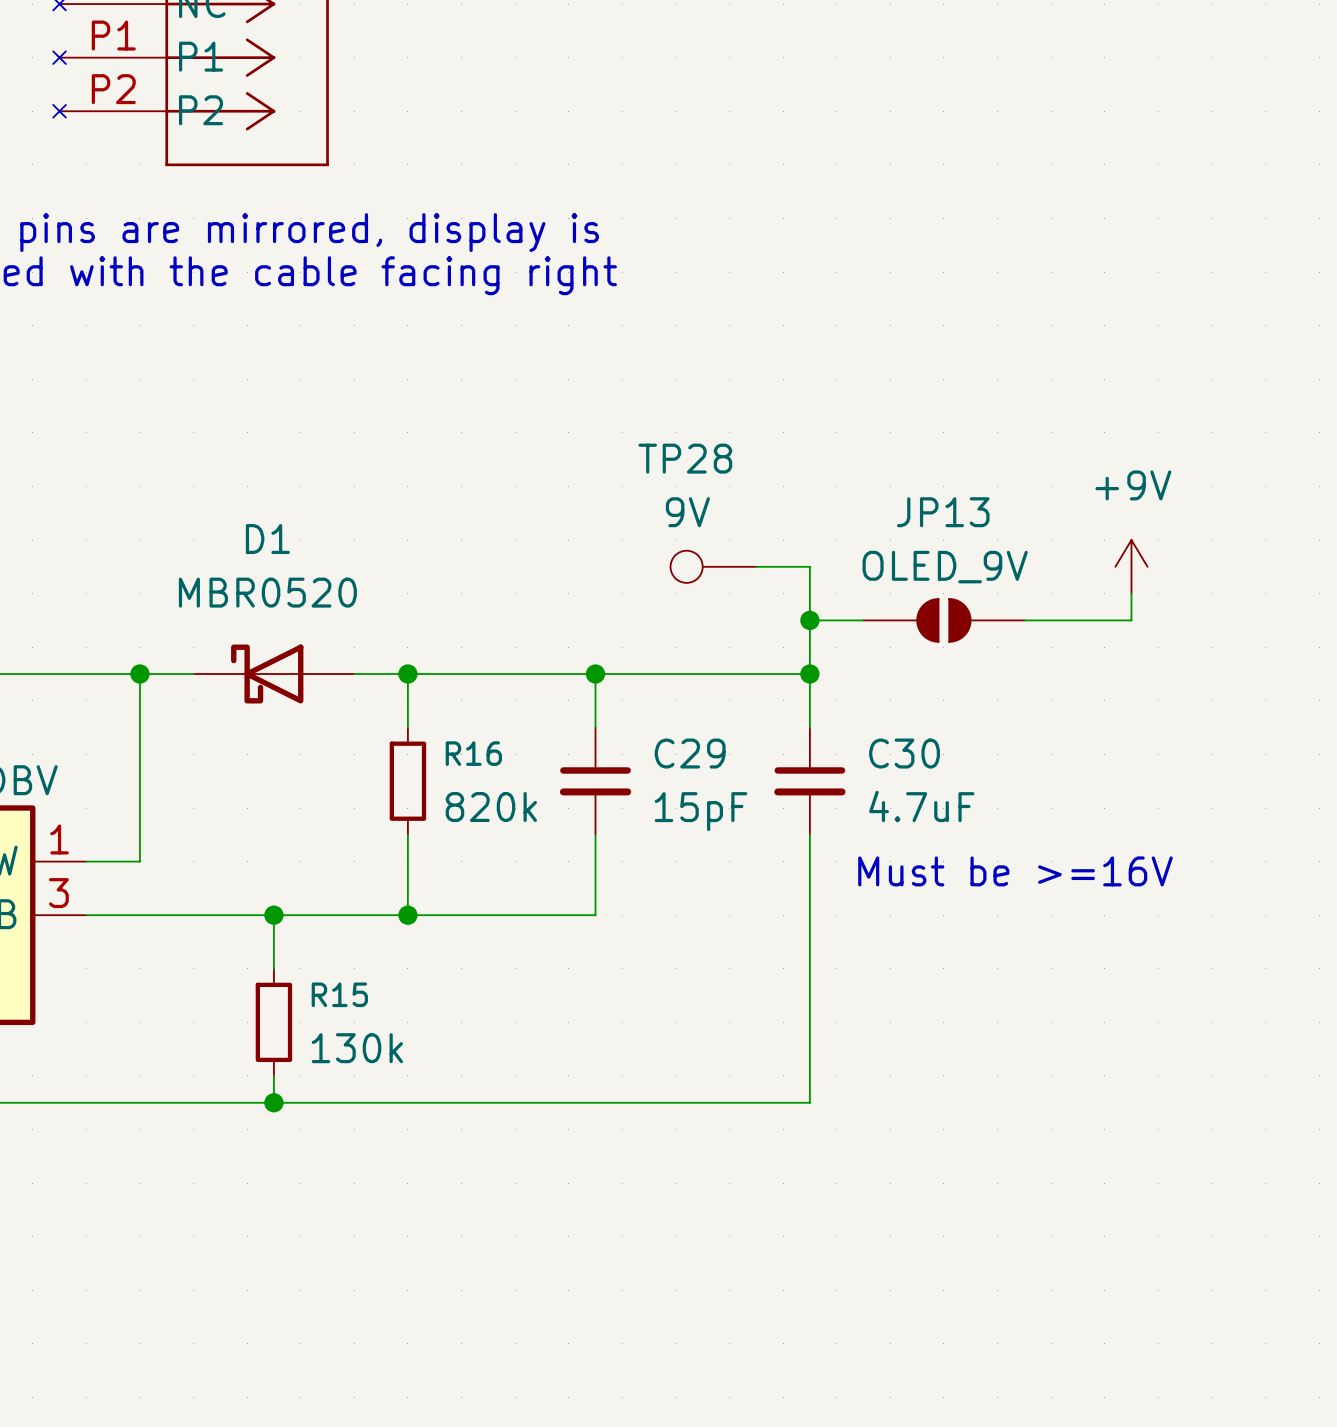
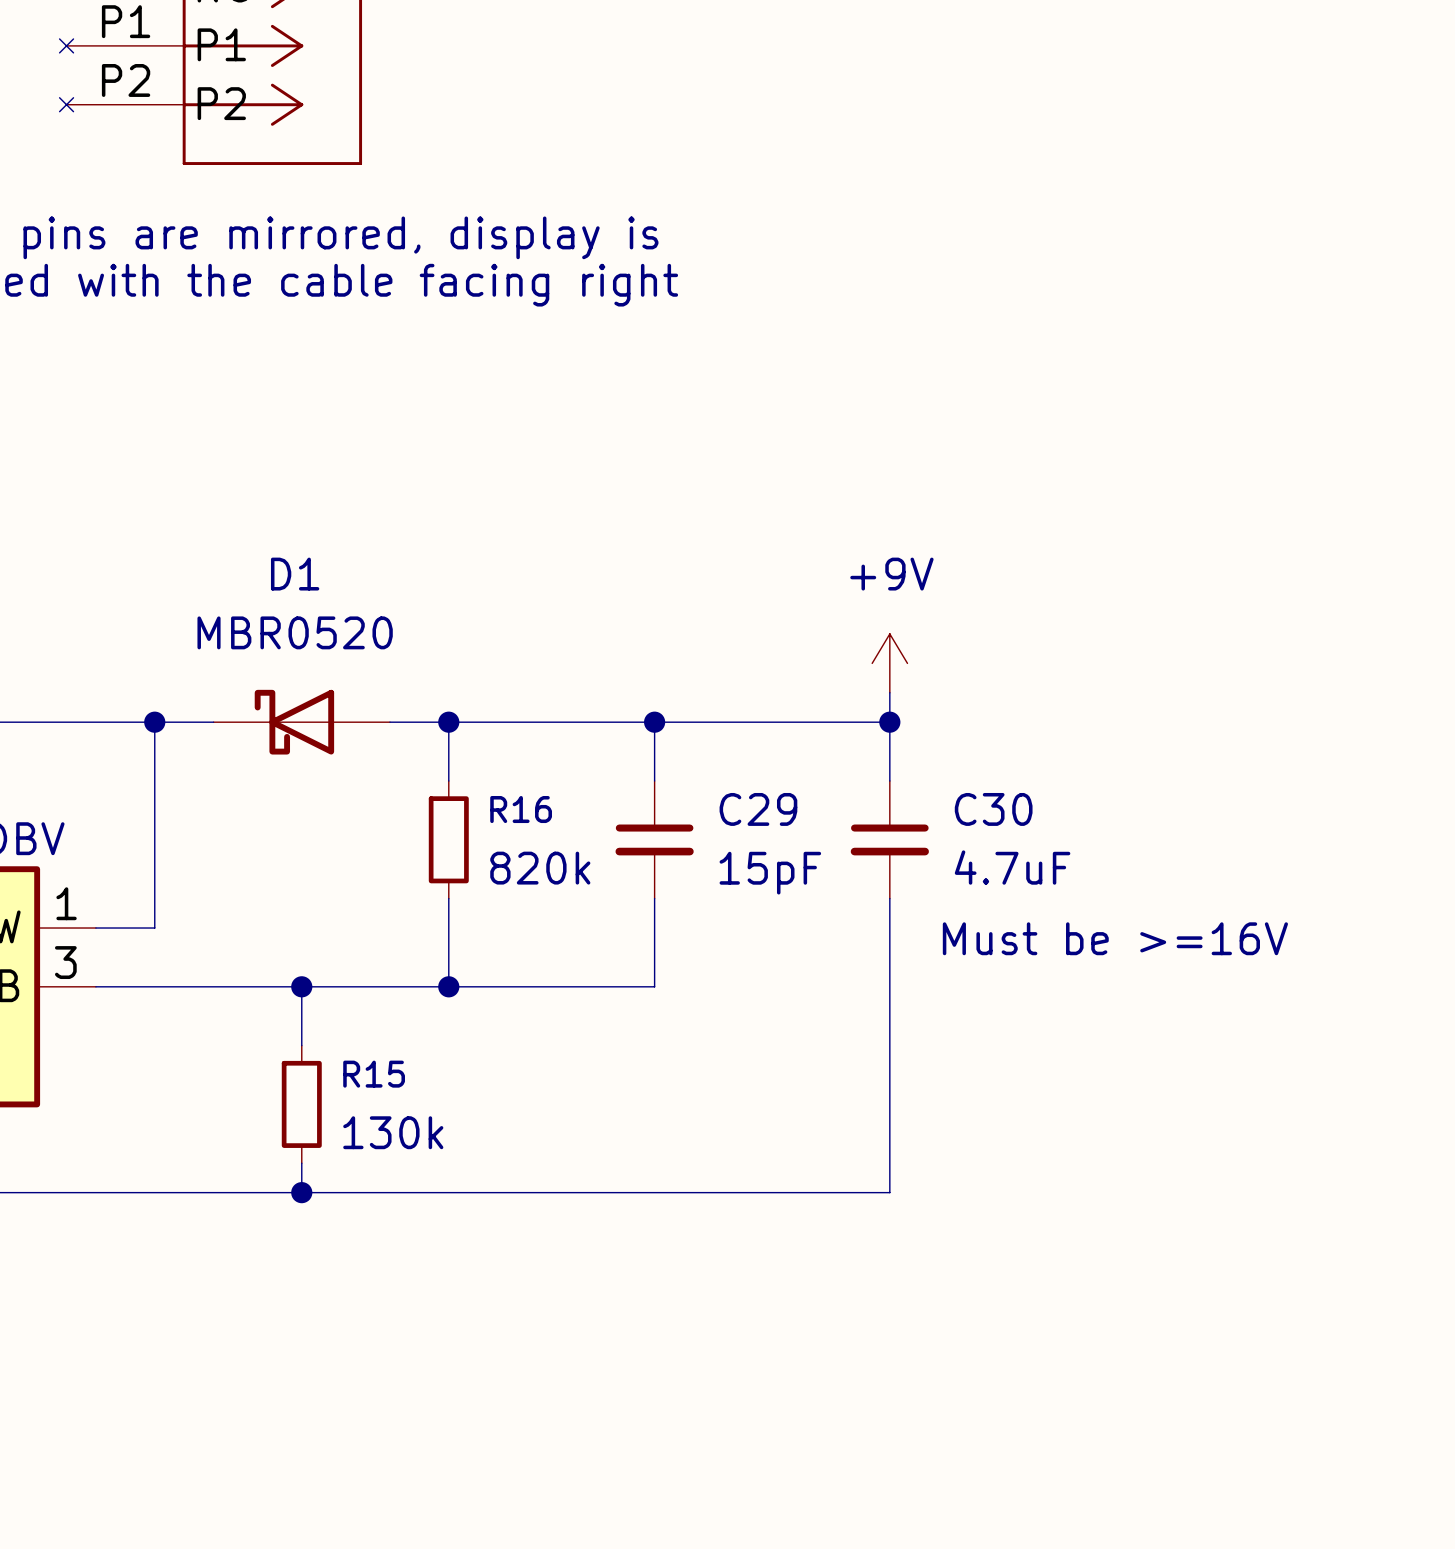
TP28: 9V (713, 566) -> none
wire: (756, 566) (809, 566) (809, 647) -> none
power symbol position: +9V (1131, 566) -> +9V (889, 663)
wire: (1131, 593) (1131, 620) (1024, 620) -> none
wire: (809, 620) (863, 620) -> none
junction: (809, 620) -> none
JP13: OLED_9V (943, 620) -> none

